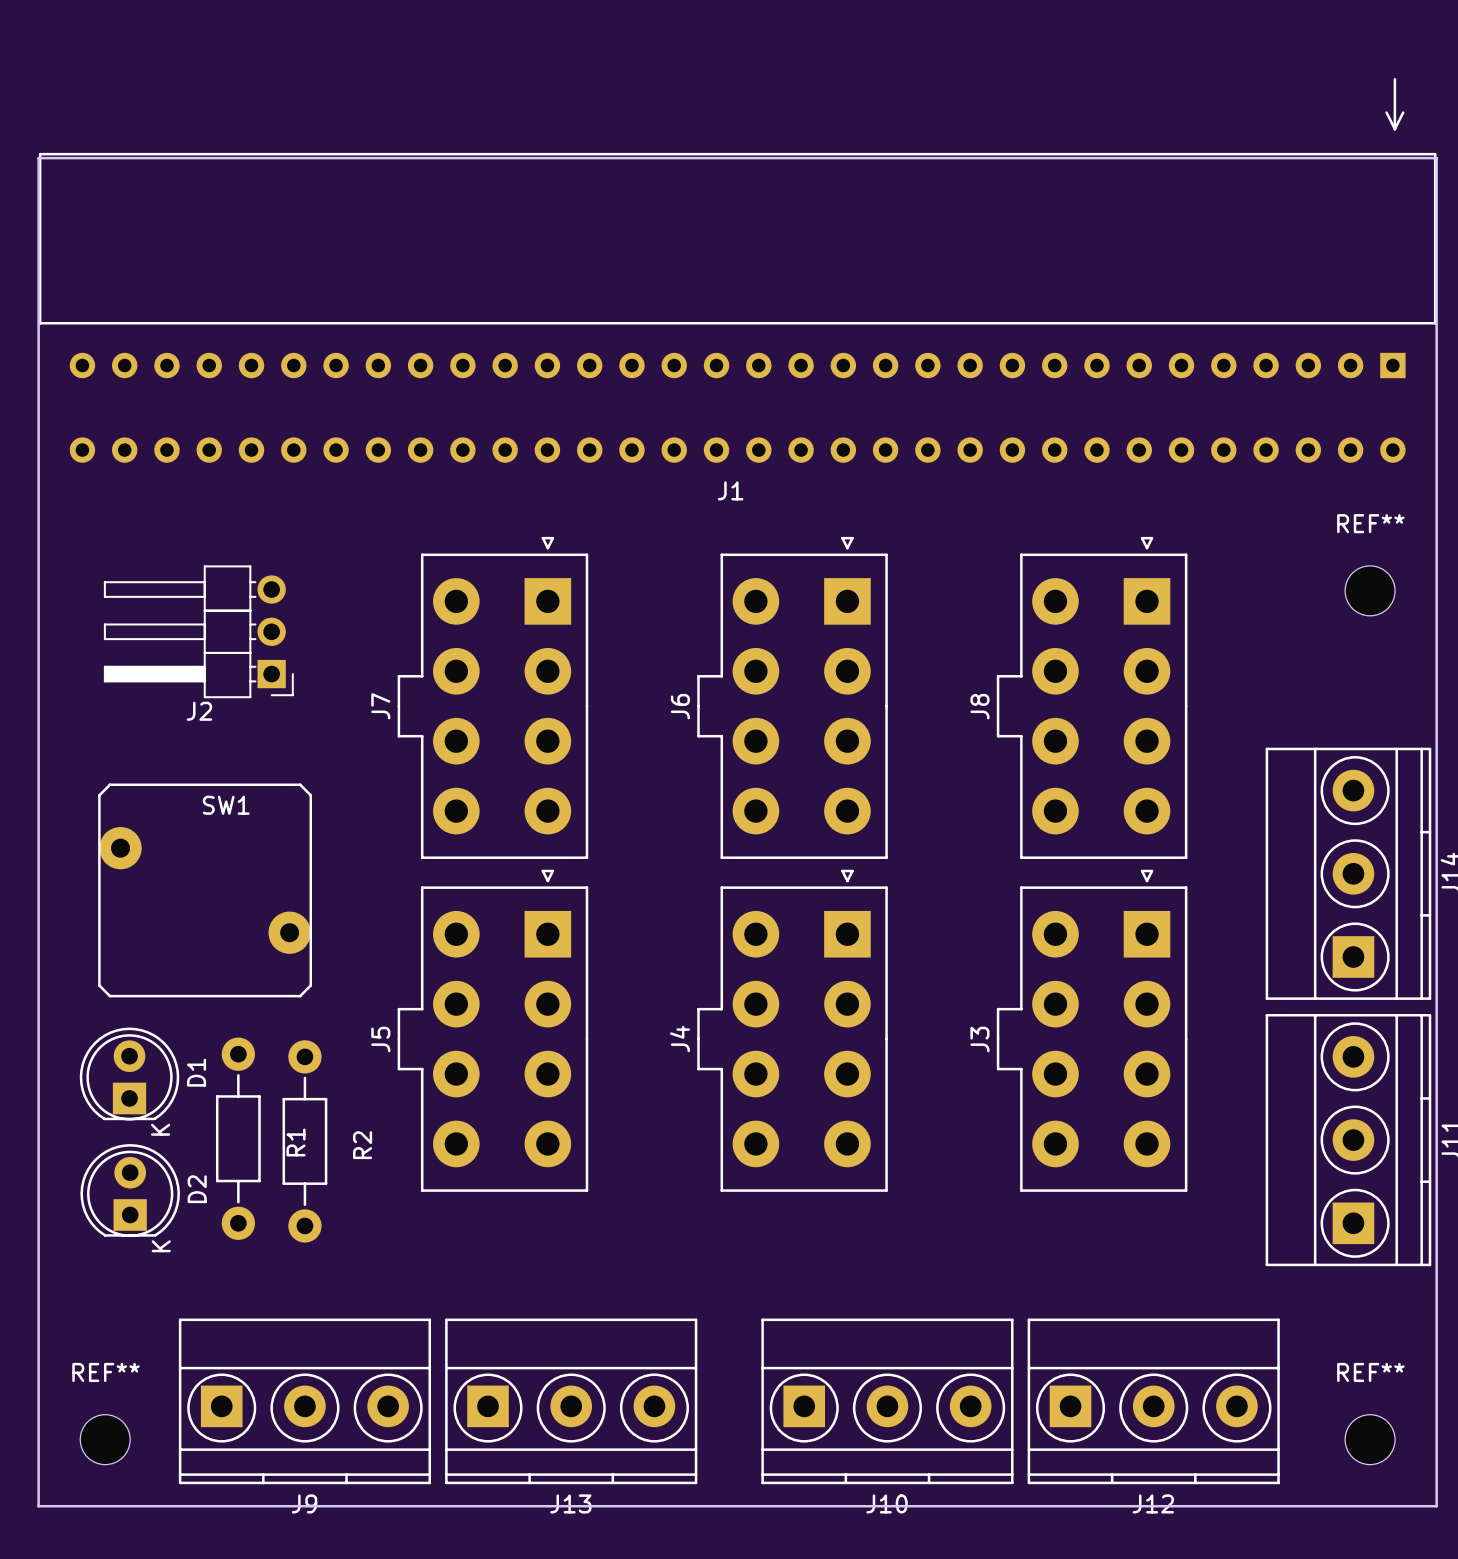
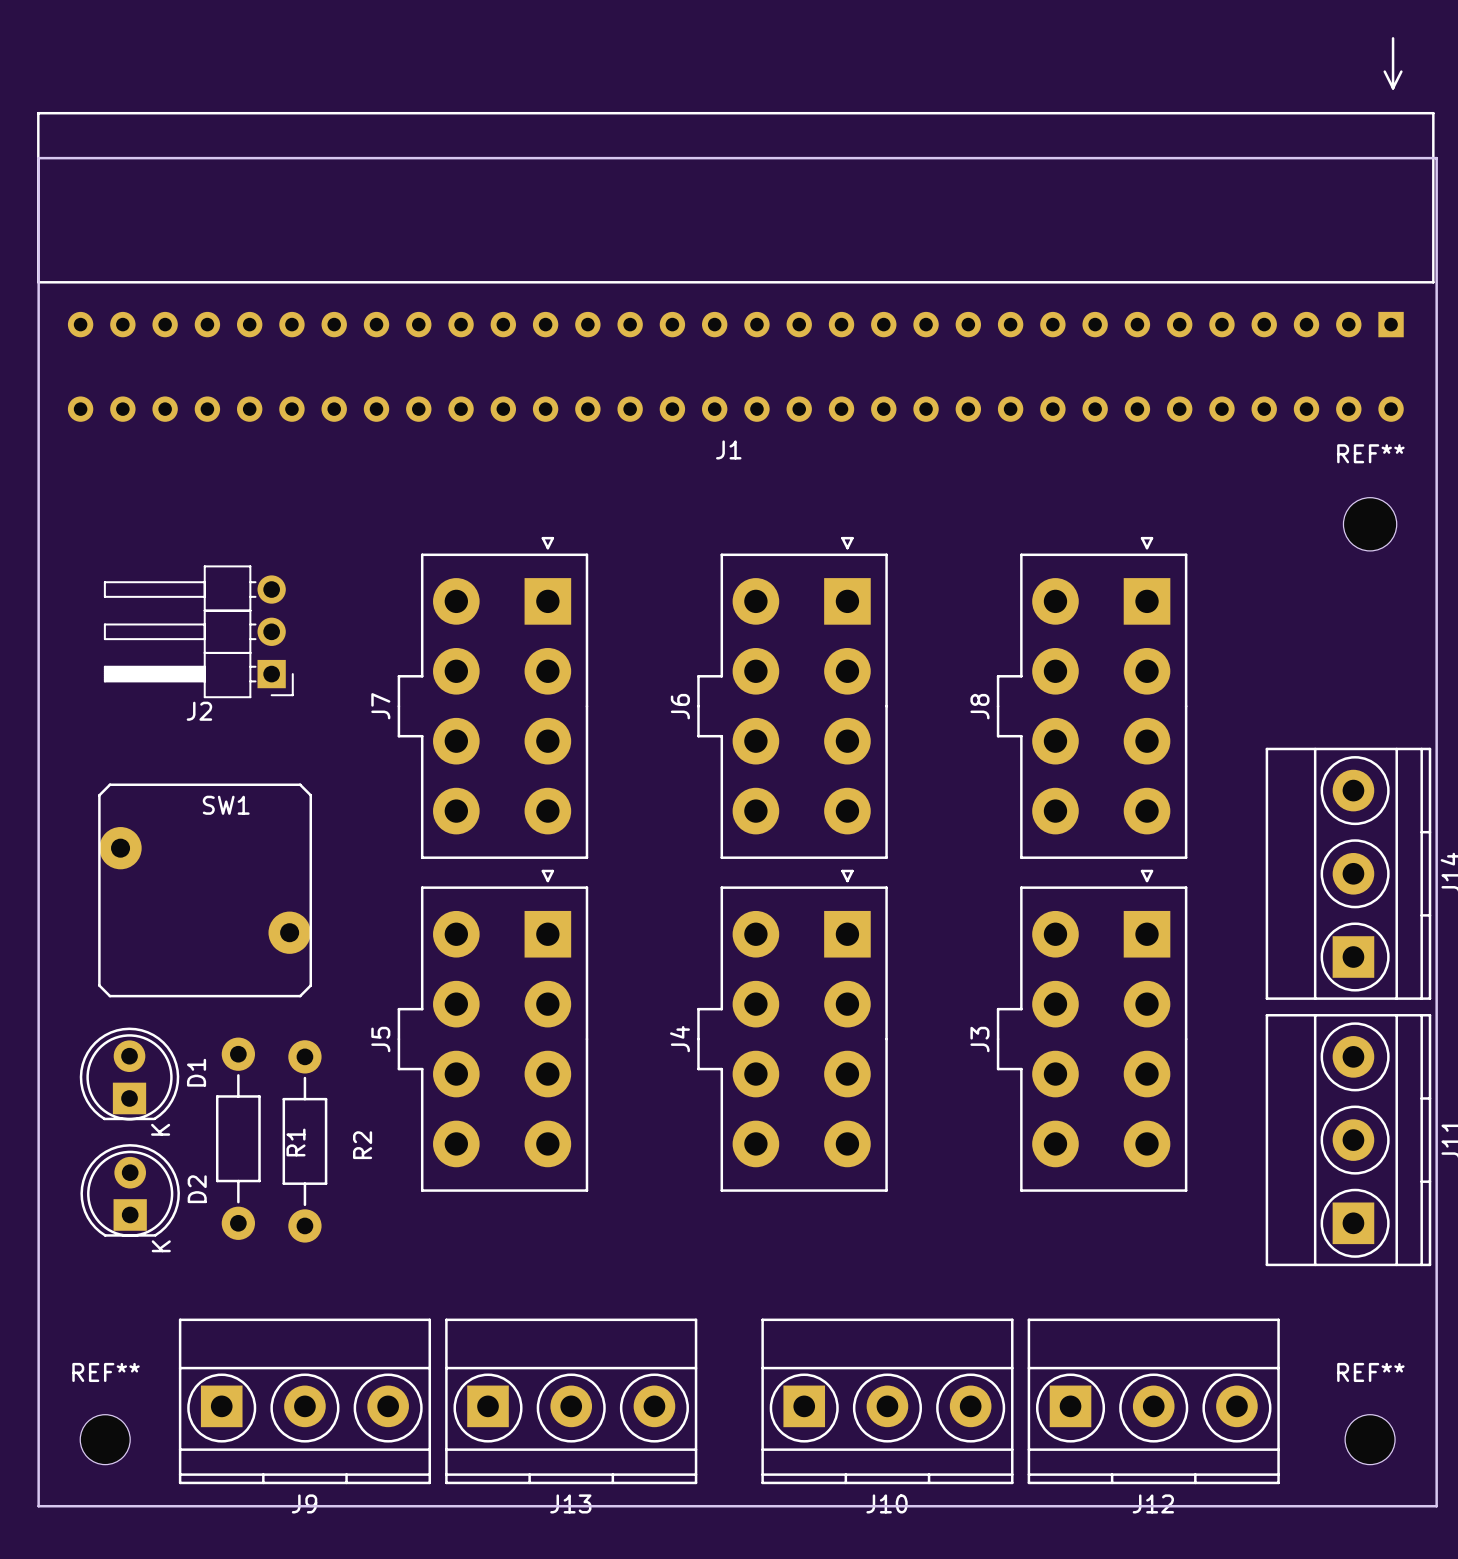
J1 position: (737, 270) -> (735, 229)
REF**: none -> (1370, 524)
REF**: (1370, 590) -> none

